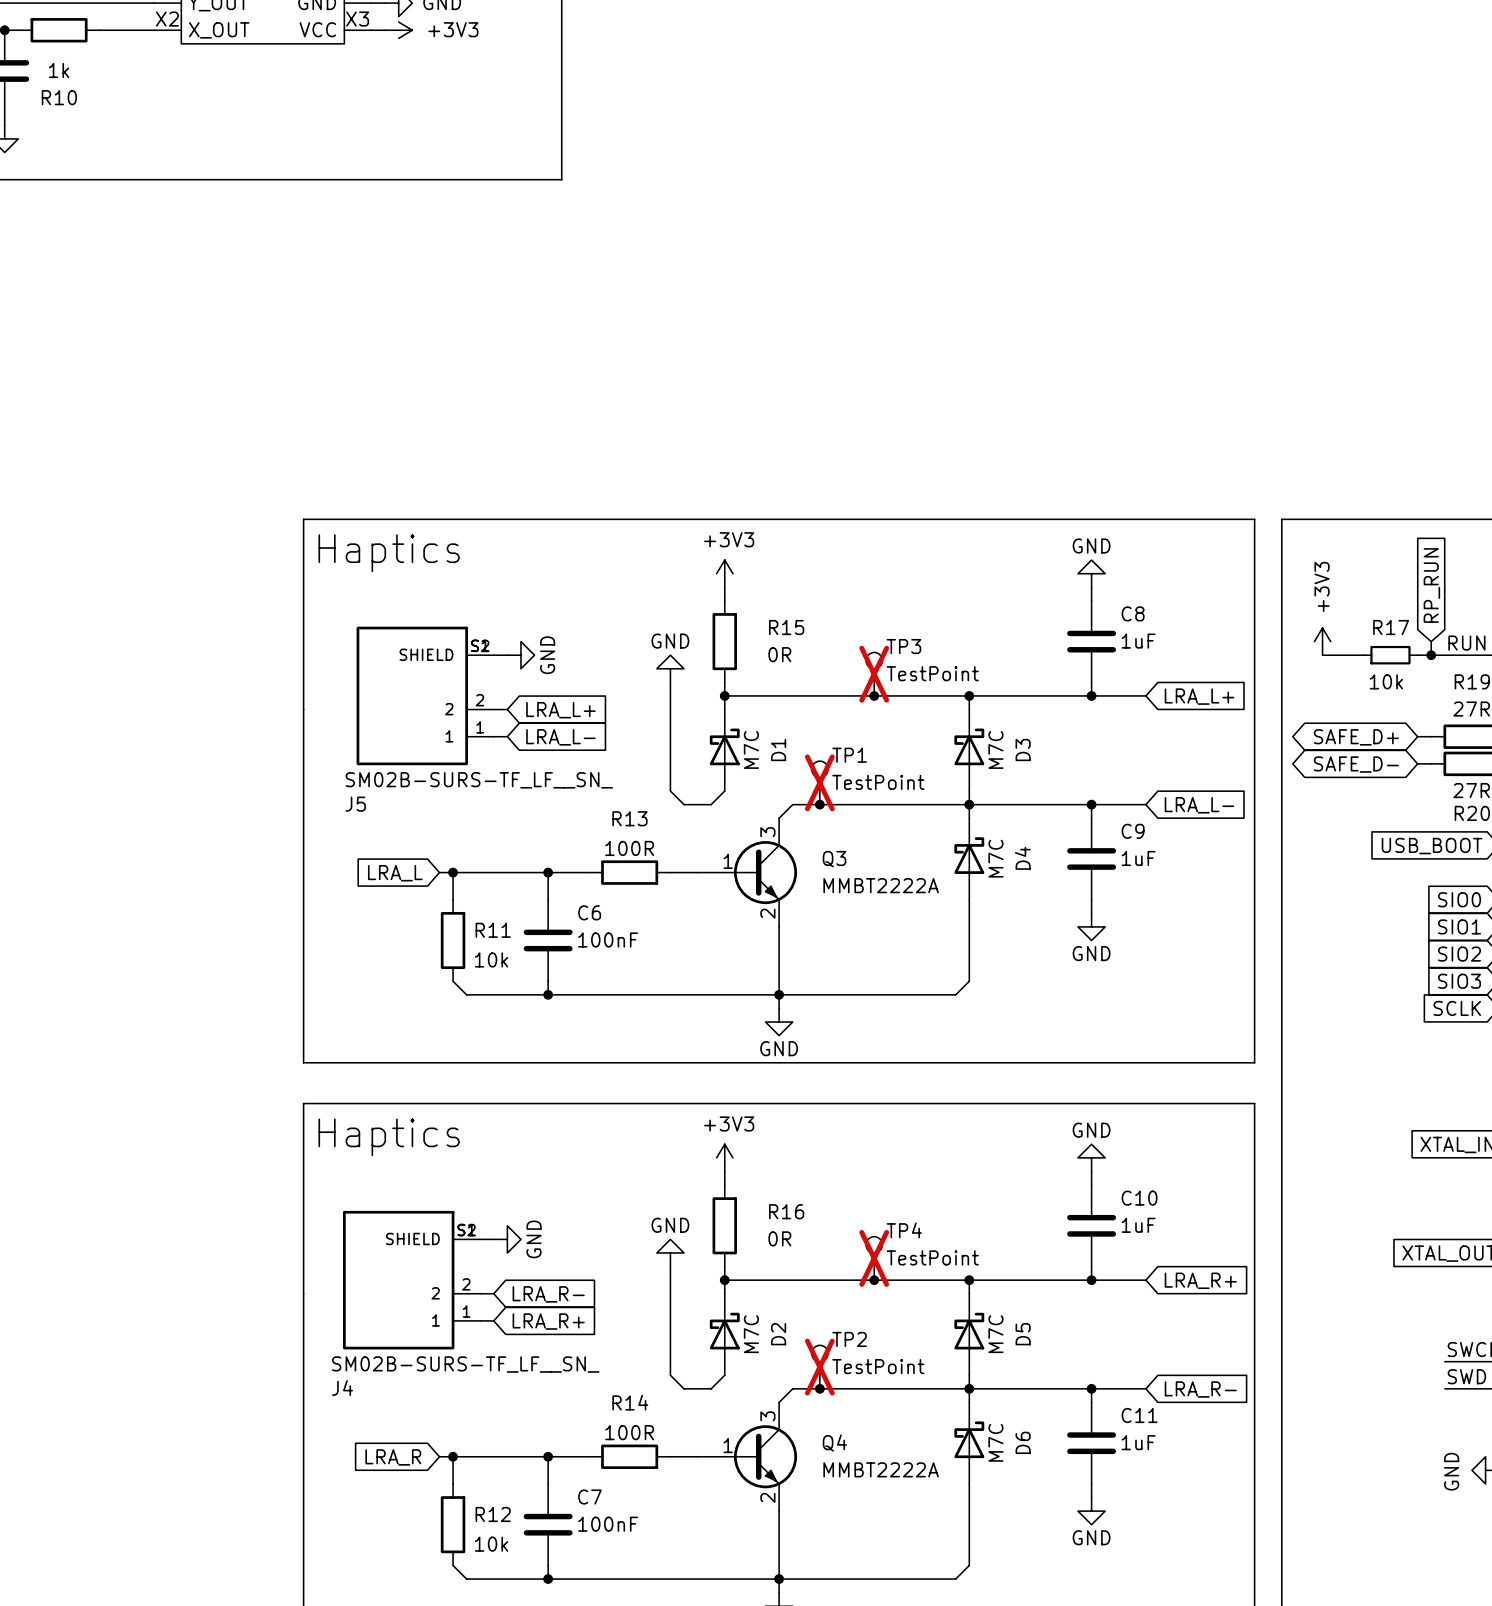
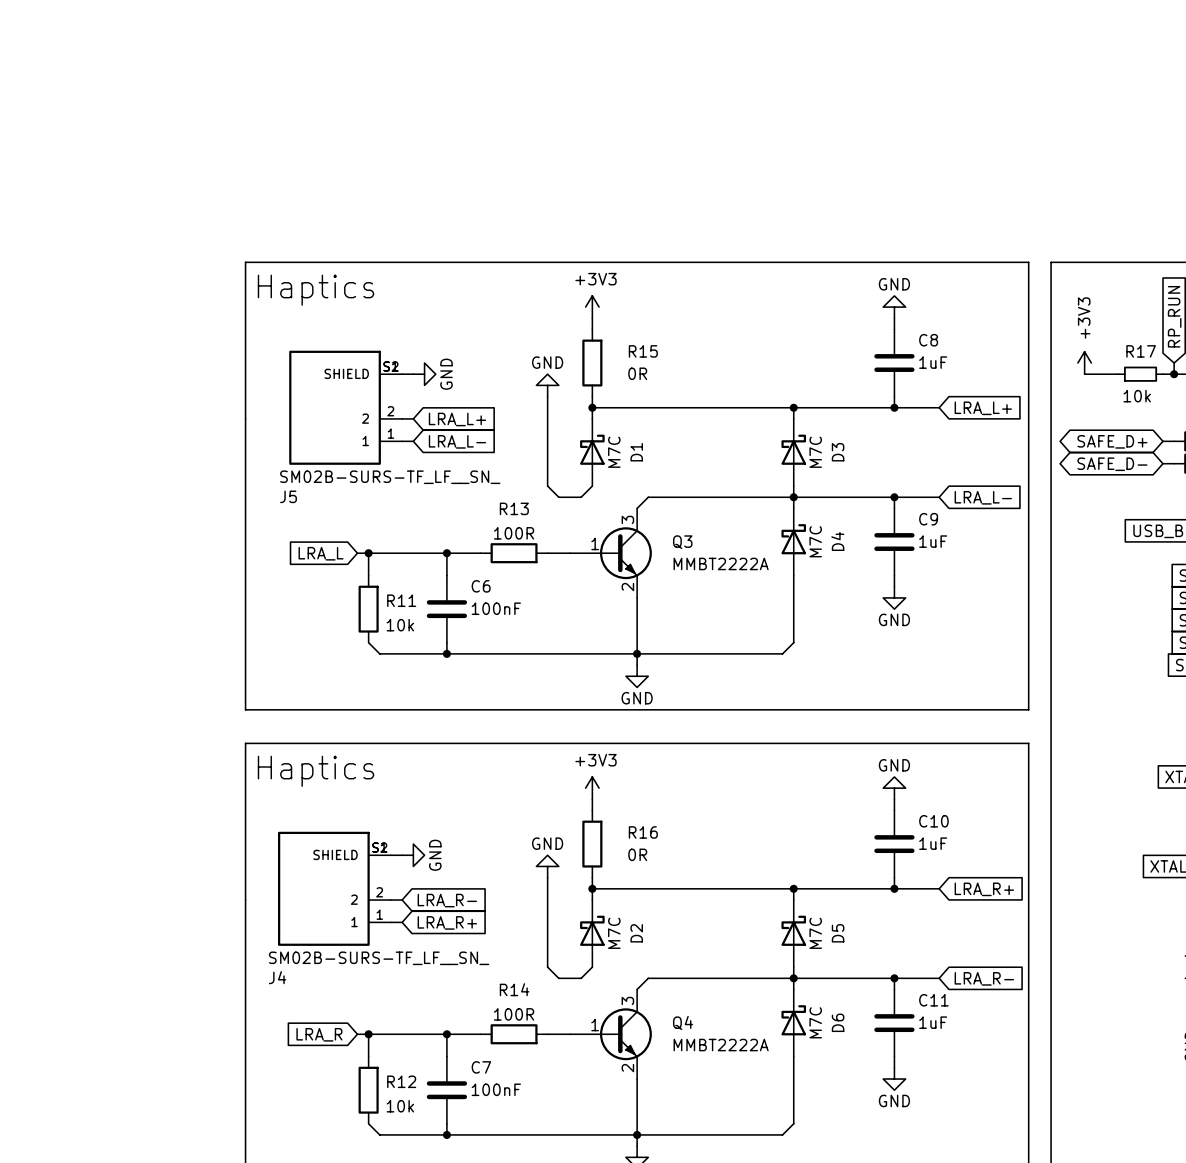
TP3: TestPoint (874, 674) -> none
junction: (874, 695) -> none
TP1: TestPoint (819, 782) -> none
junction: (819, 804) -> none
TP4: TestPoint (874, 1258) -> none
junction: (874, 1280) -> none
TP2: TestPoint (819, 1367) -> none
junction: (819, 1388) -> none

